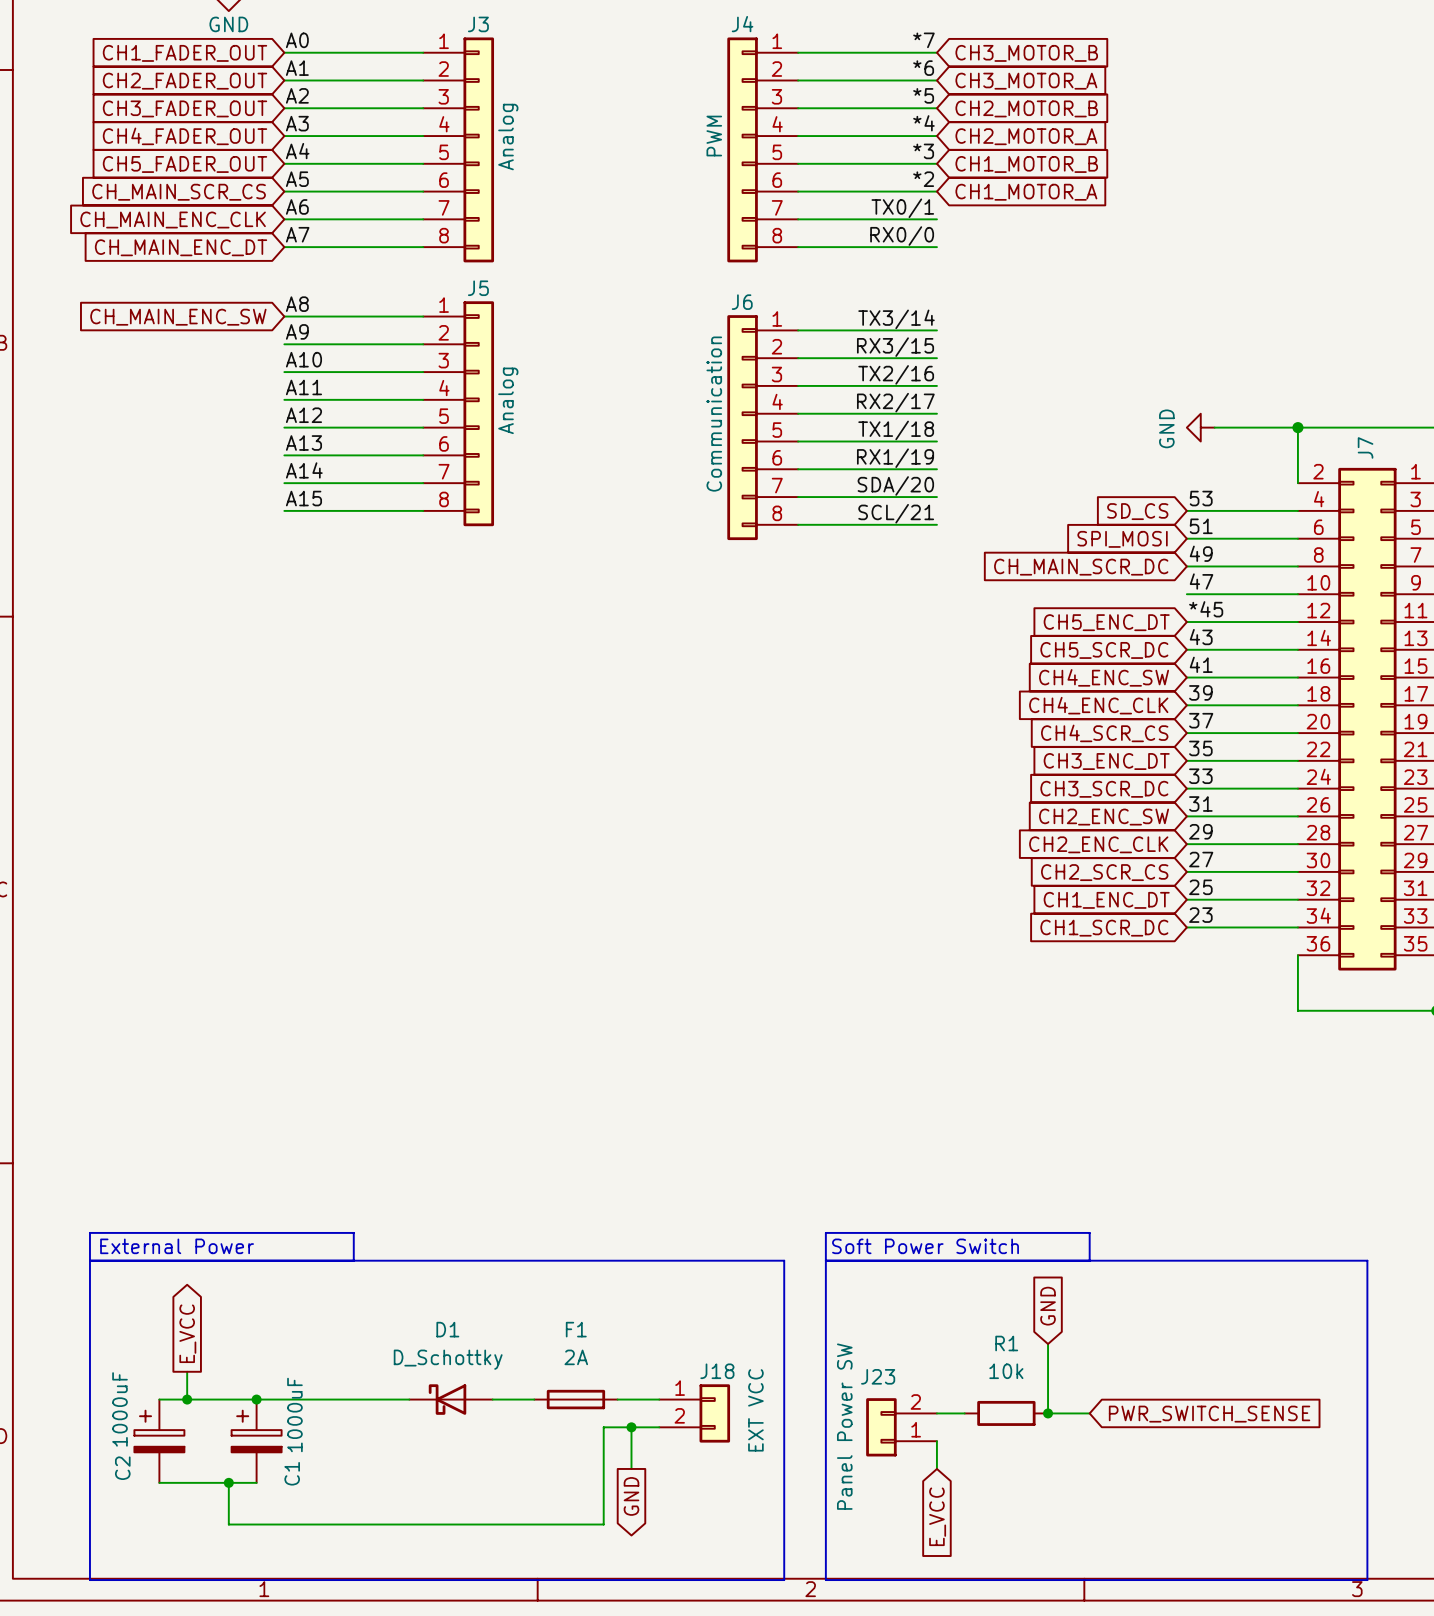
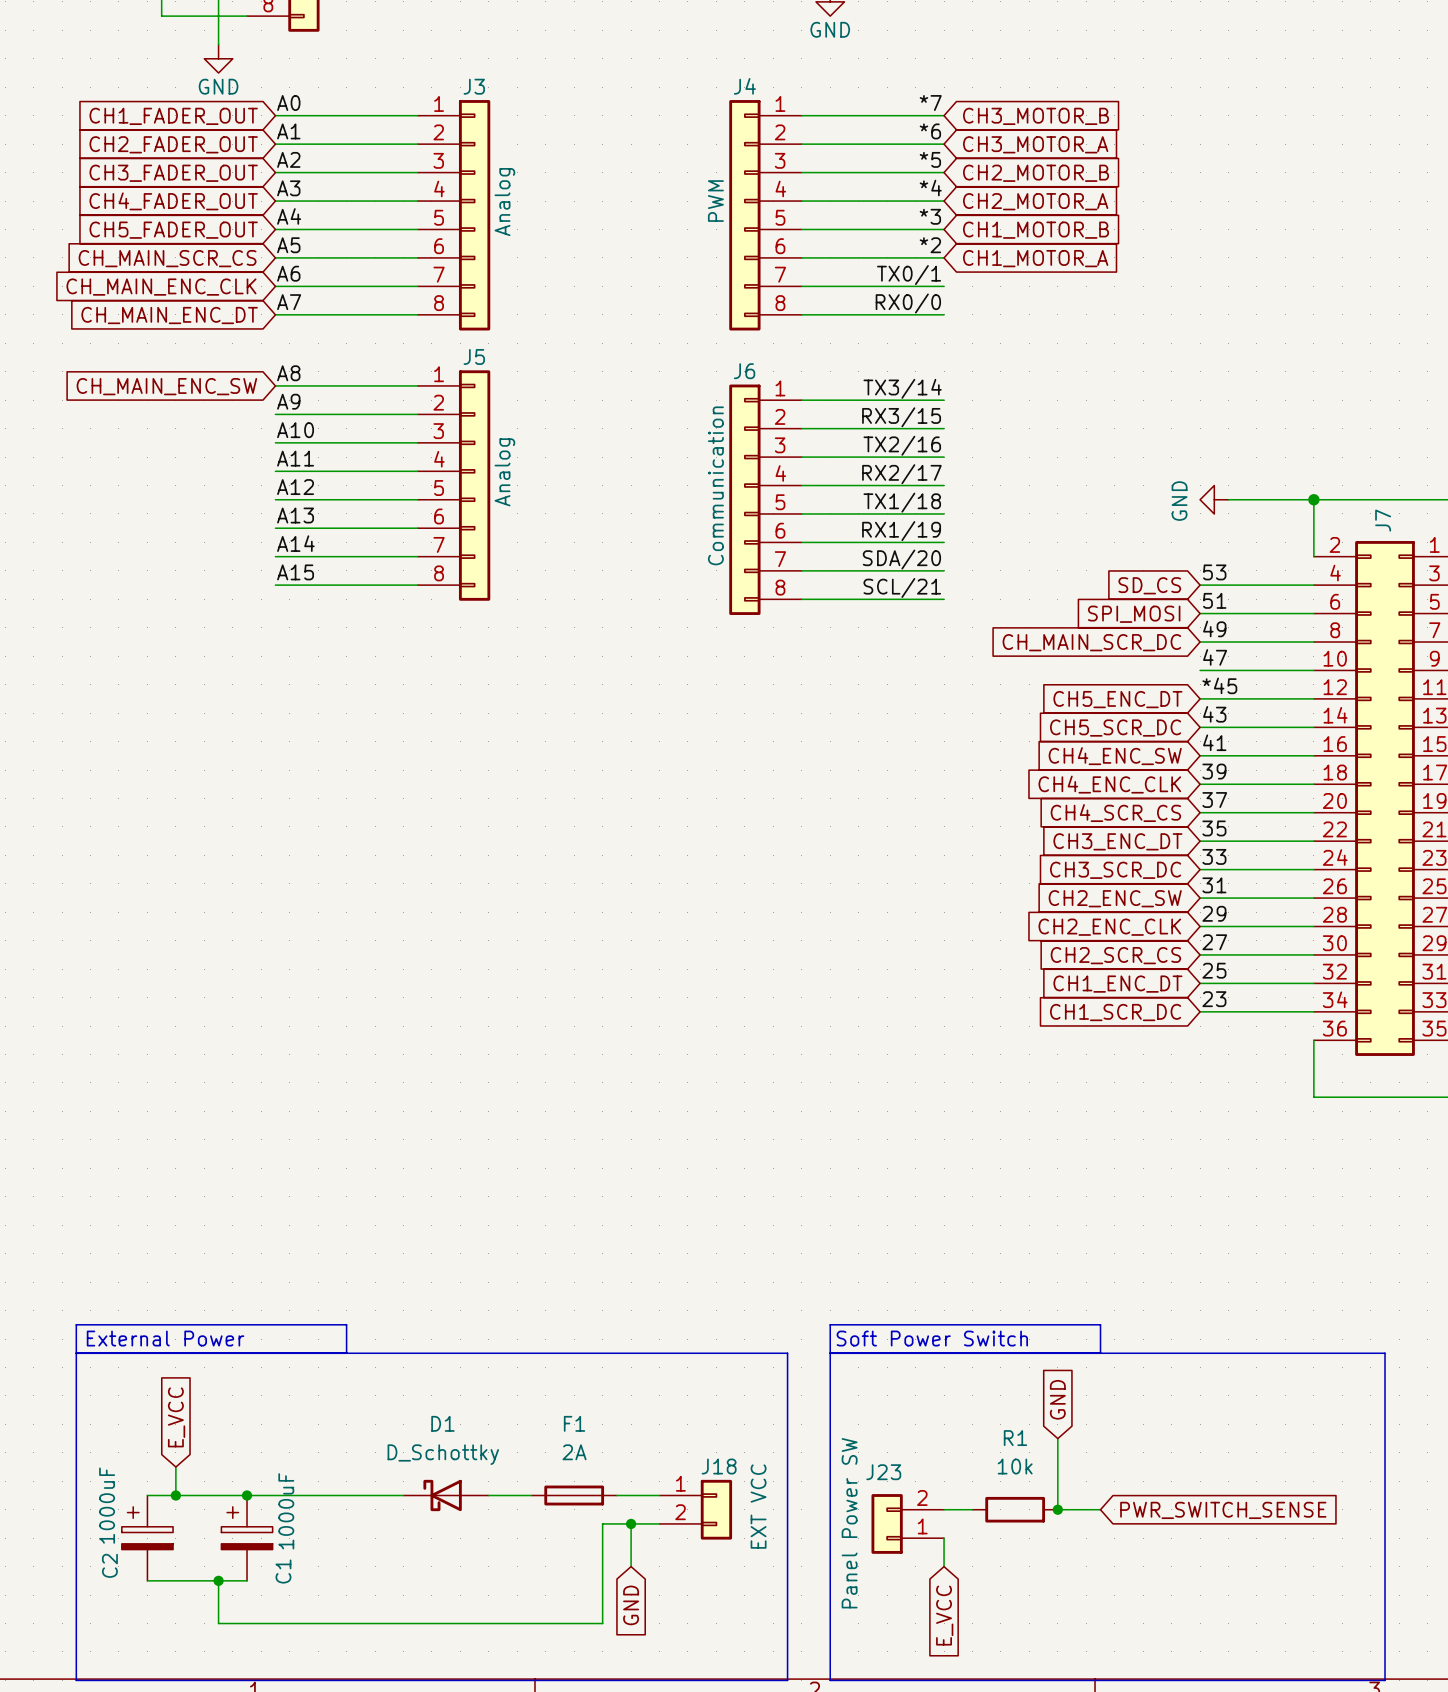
global label shape: output (187, 1333) -> input (176, 1417)
global label shape: output (631, 1496) -> input (631, 1605)

